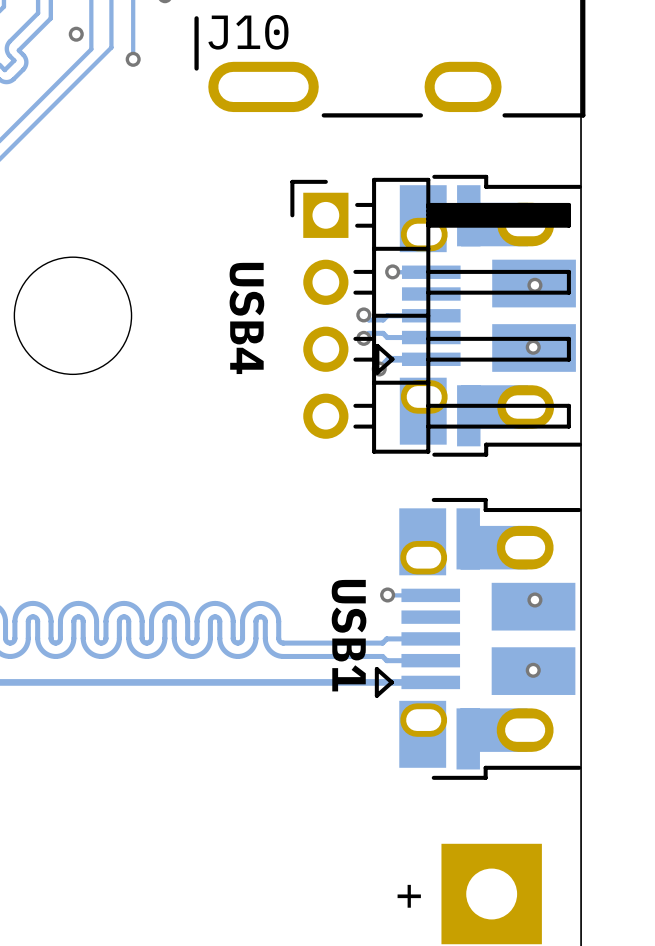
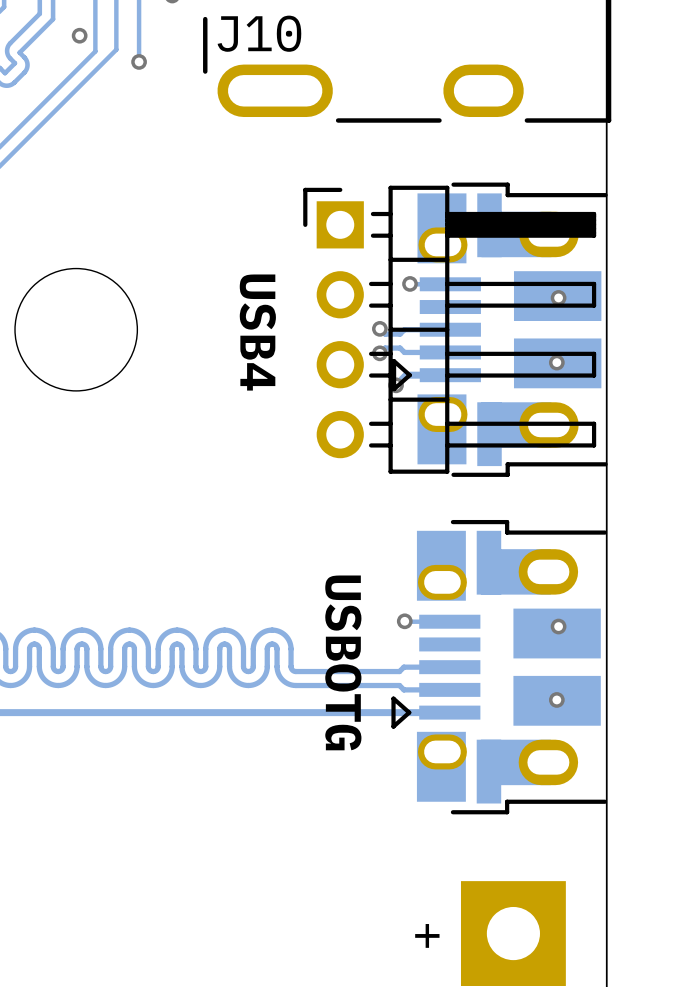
text: USB1 (349, 635) -> USBOTG (343, 662)

